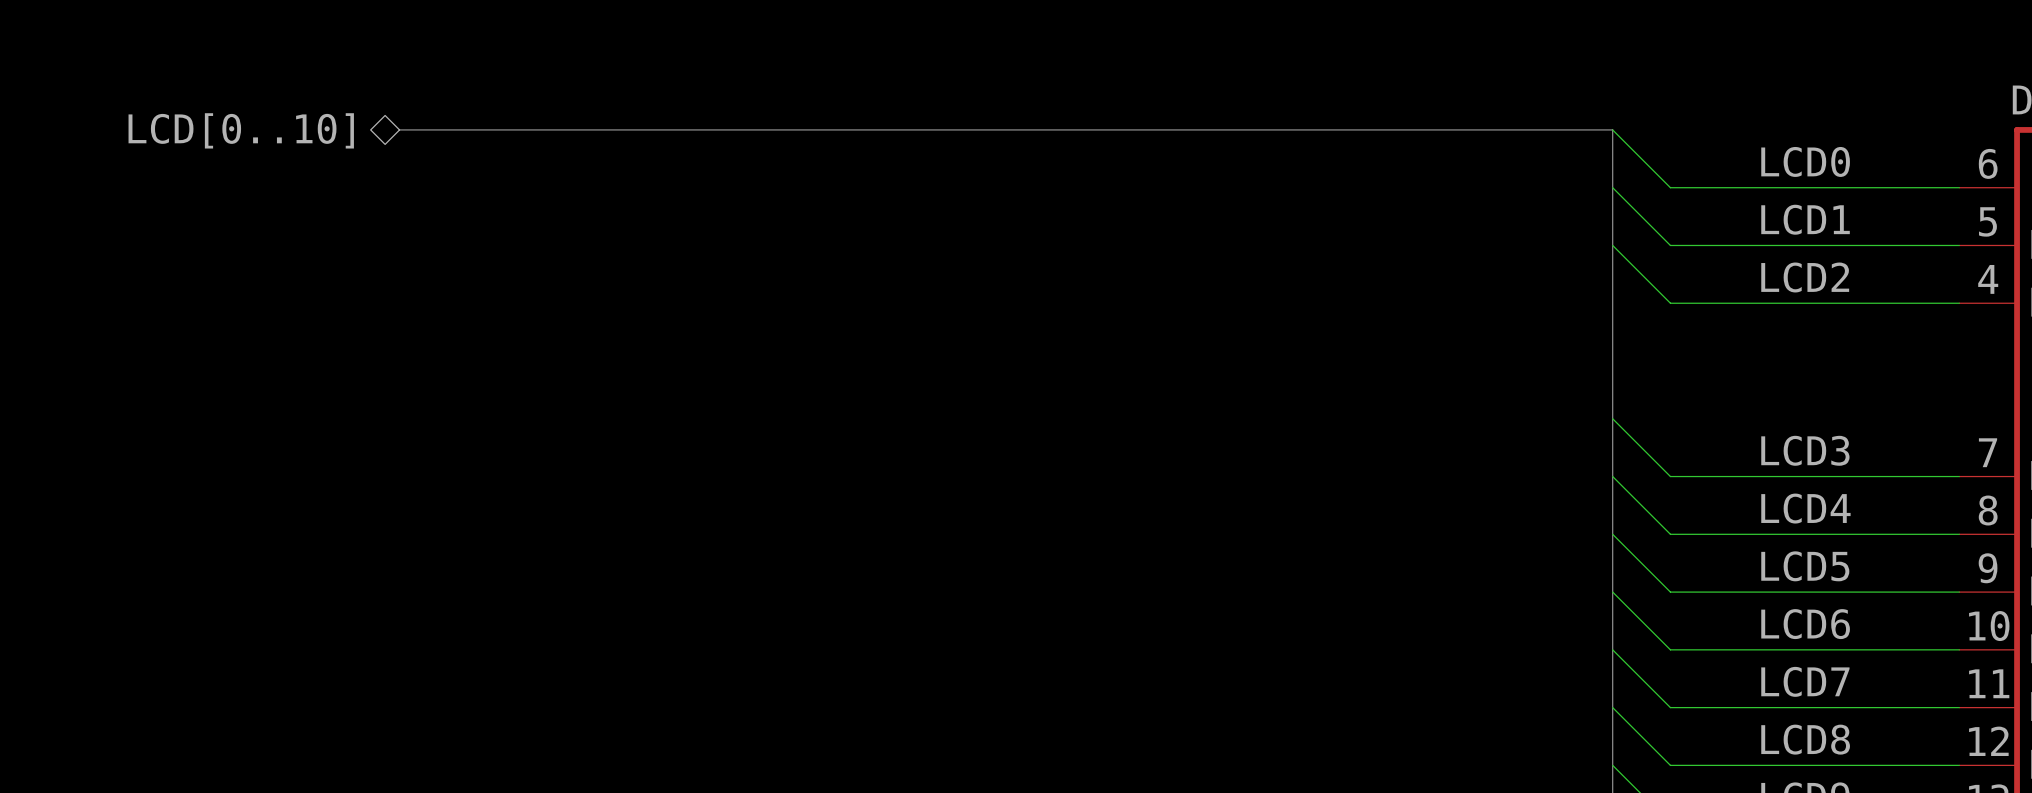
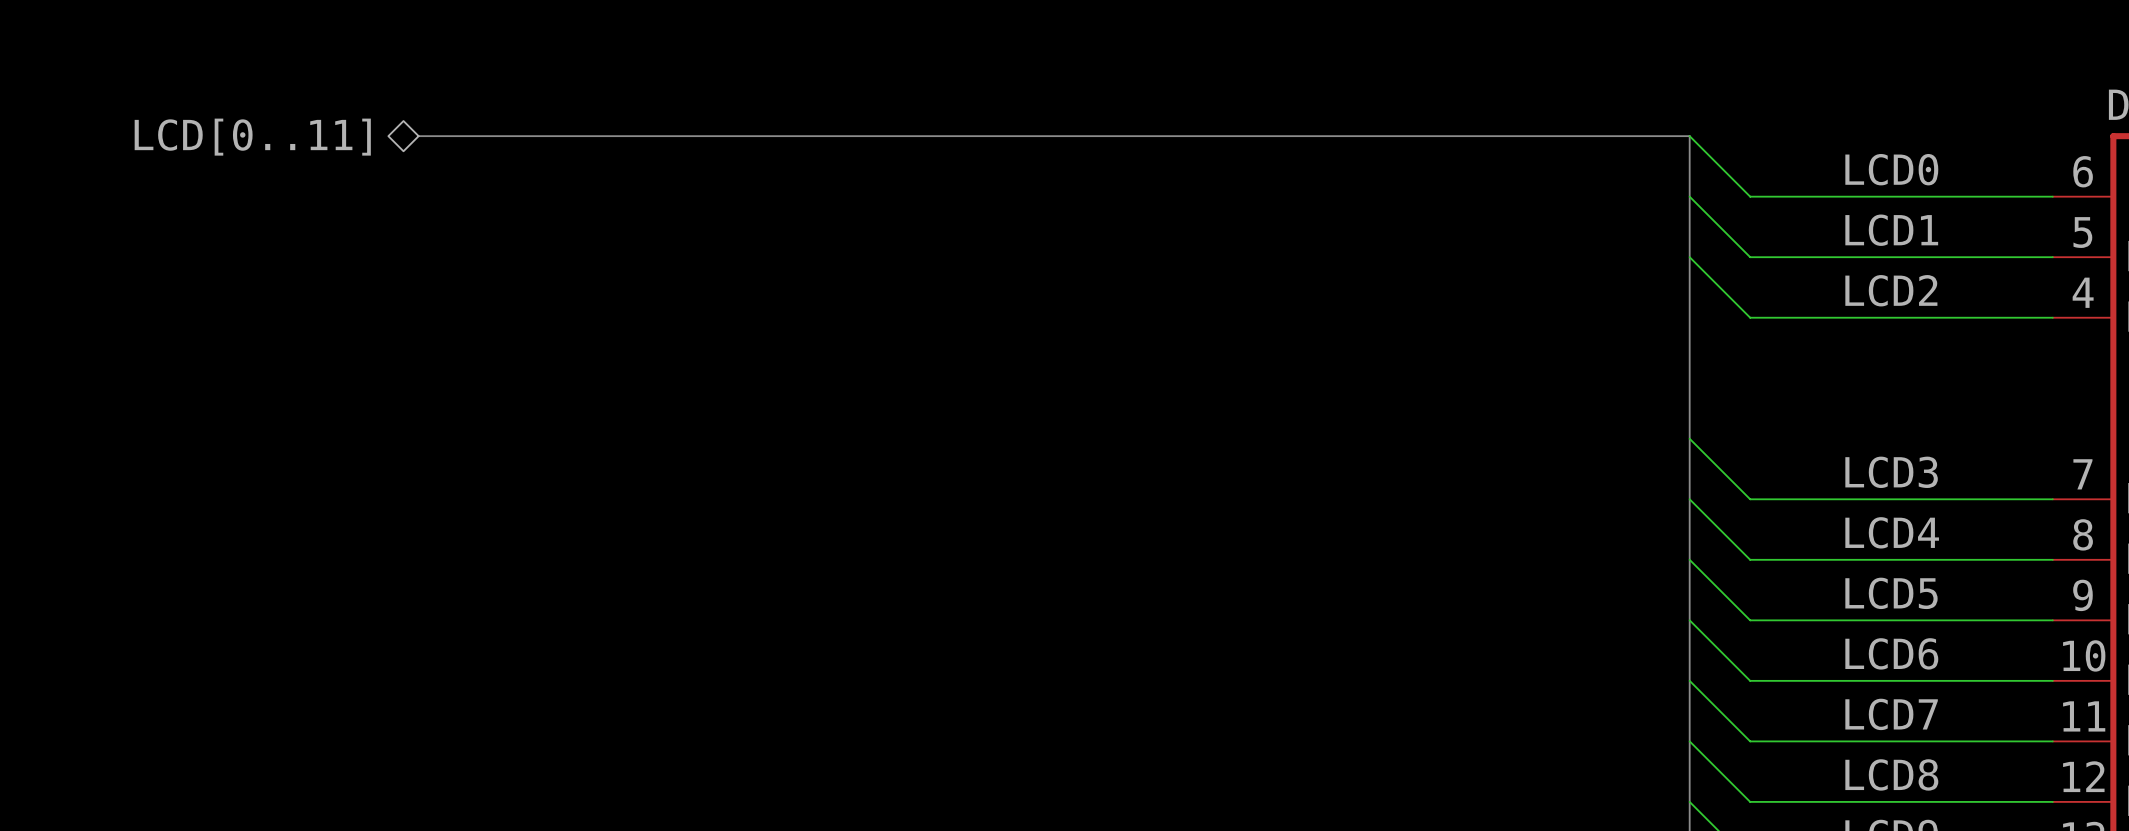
hierarchical label: LCD[0..10] (241, 130) -> LCD[0..11] (252, 137)

